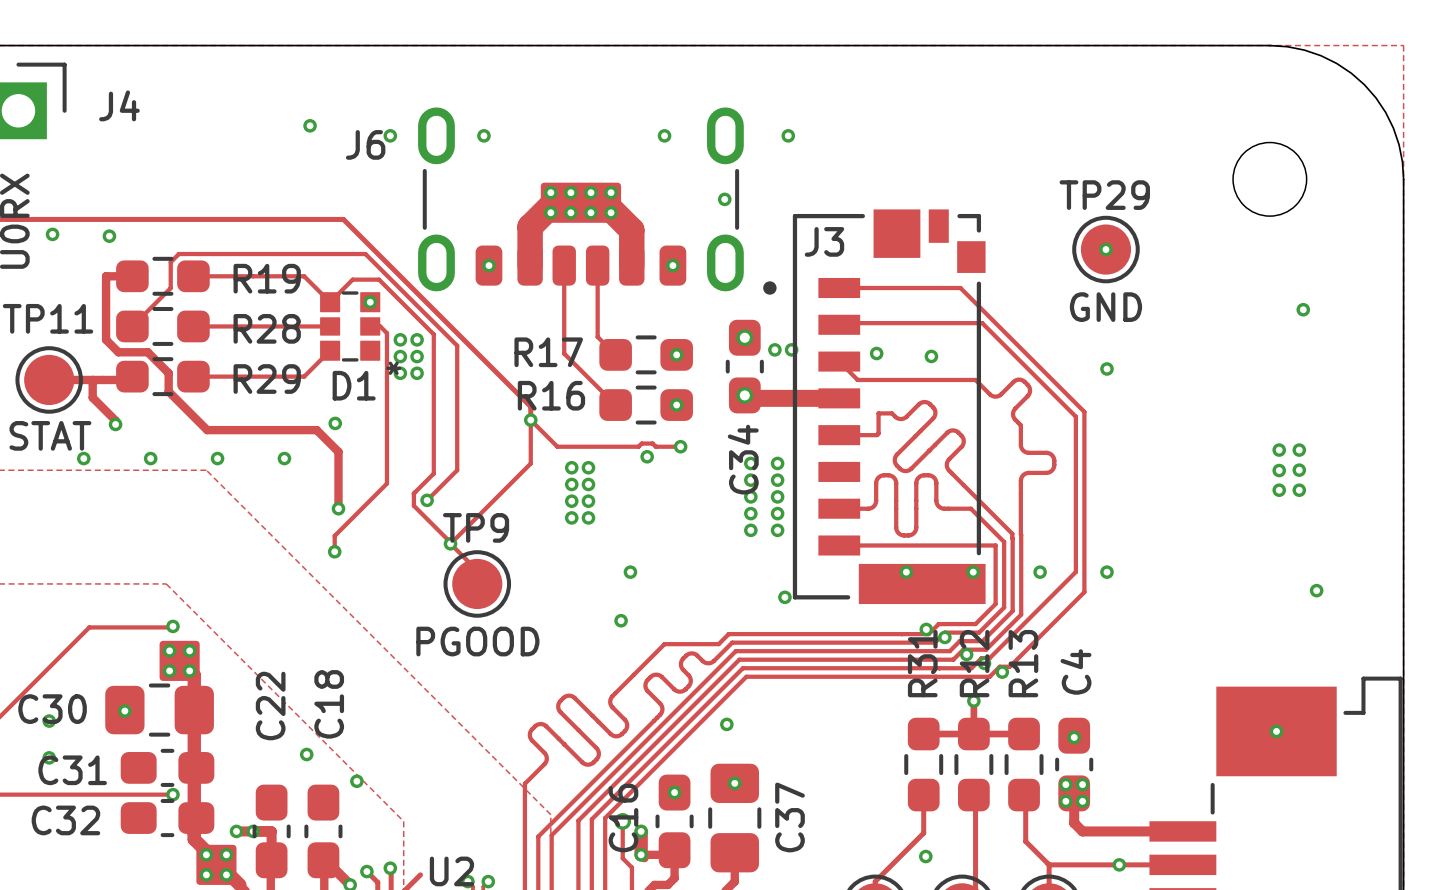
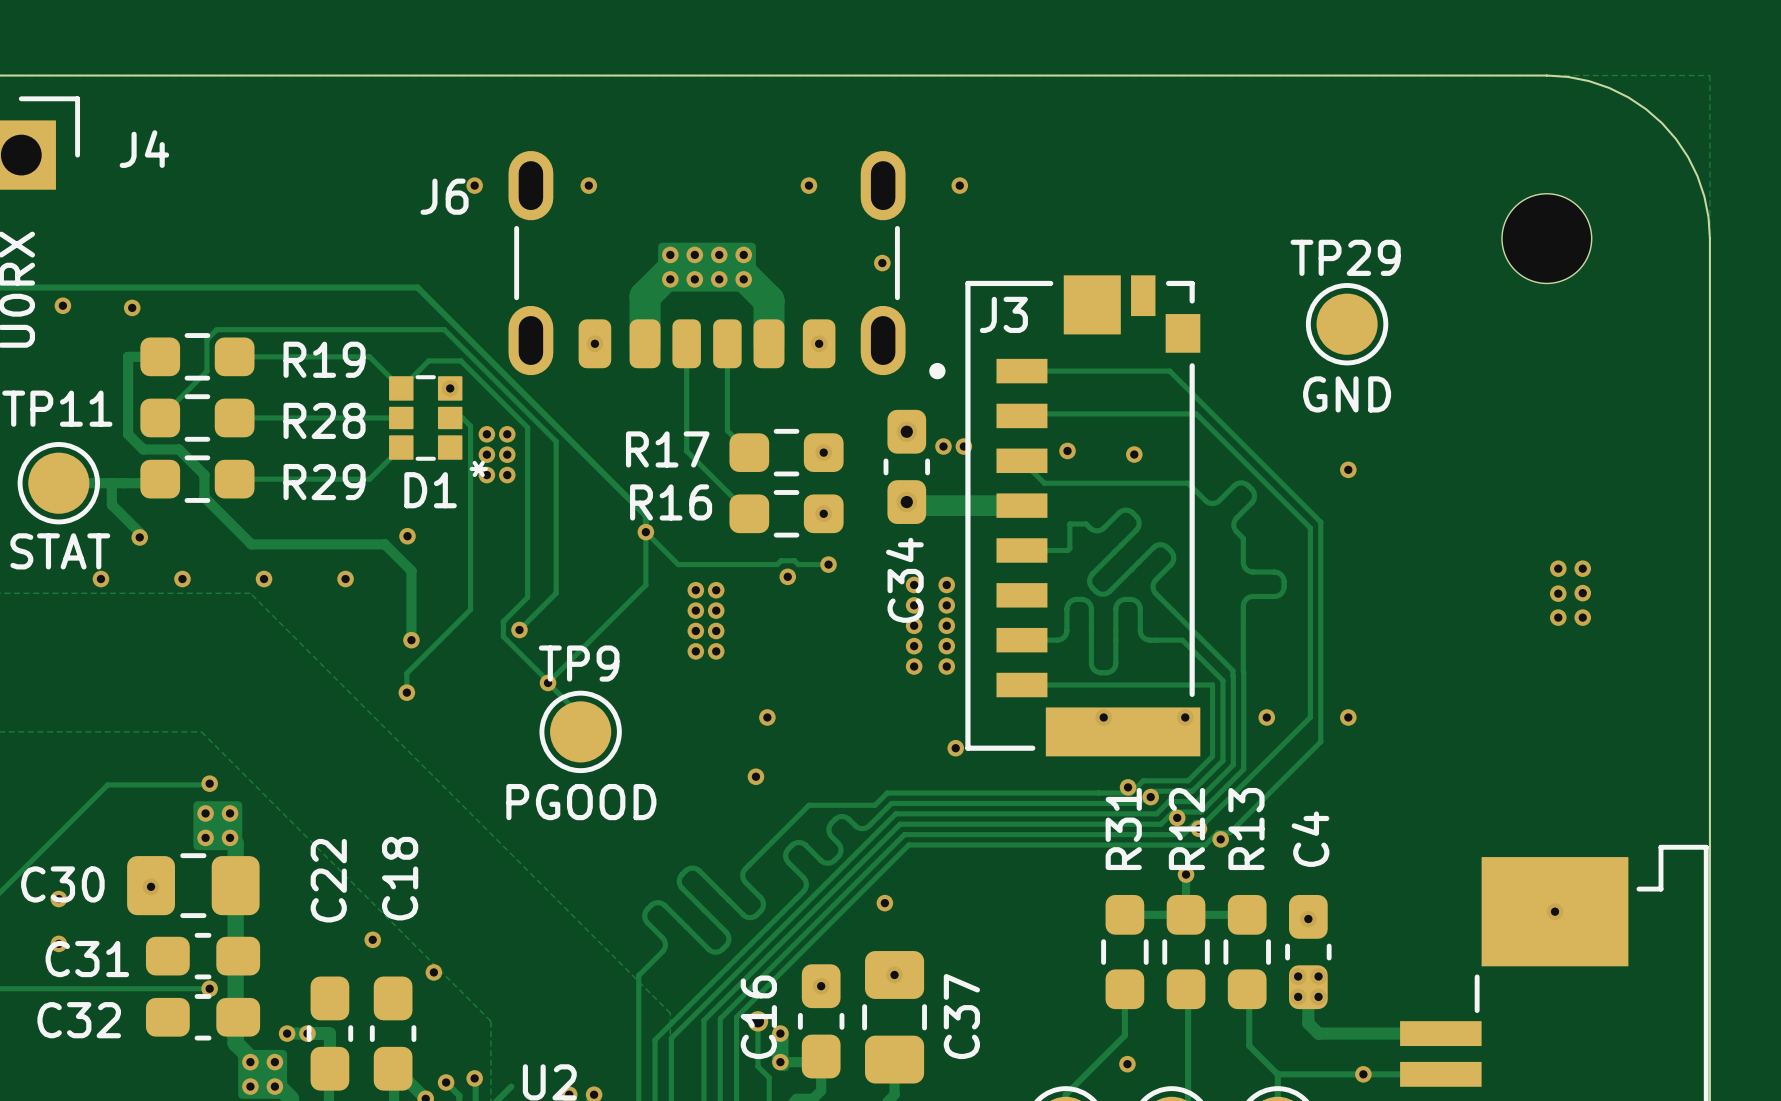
via: (310, 125) -> none
via: (1105, 249) -> none
via: (1303, 309) -> none
via: (1316, 590) -> none

